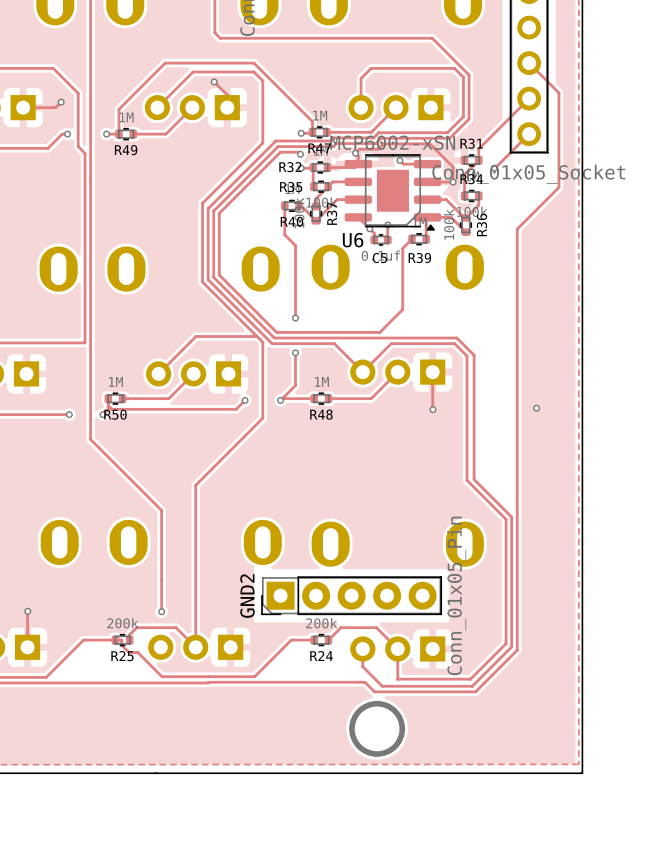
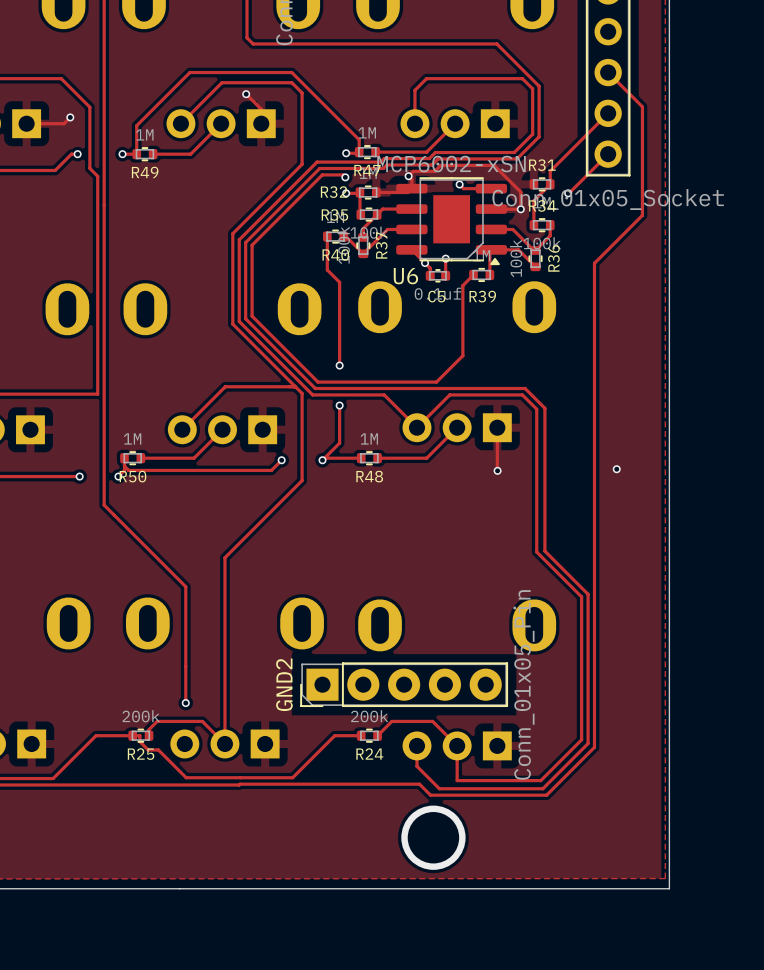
track: (27, 611) (27, 647) -> none
via: (27, 611) -> none

